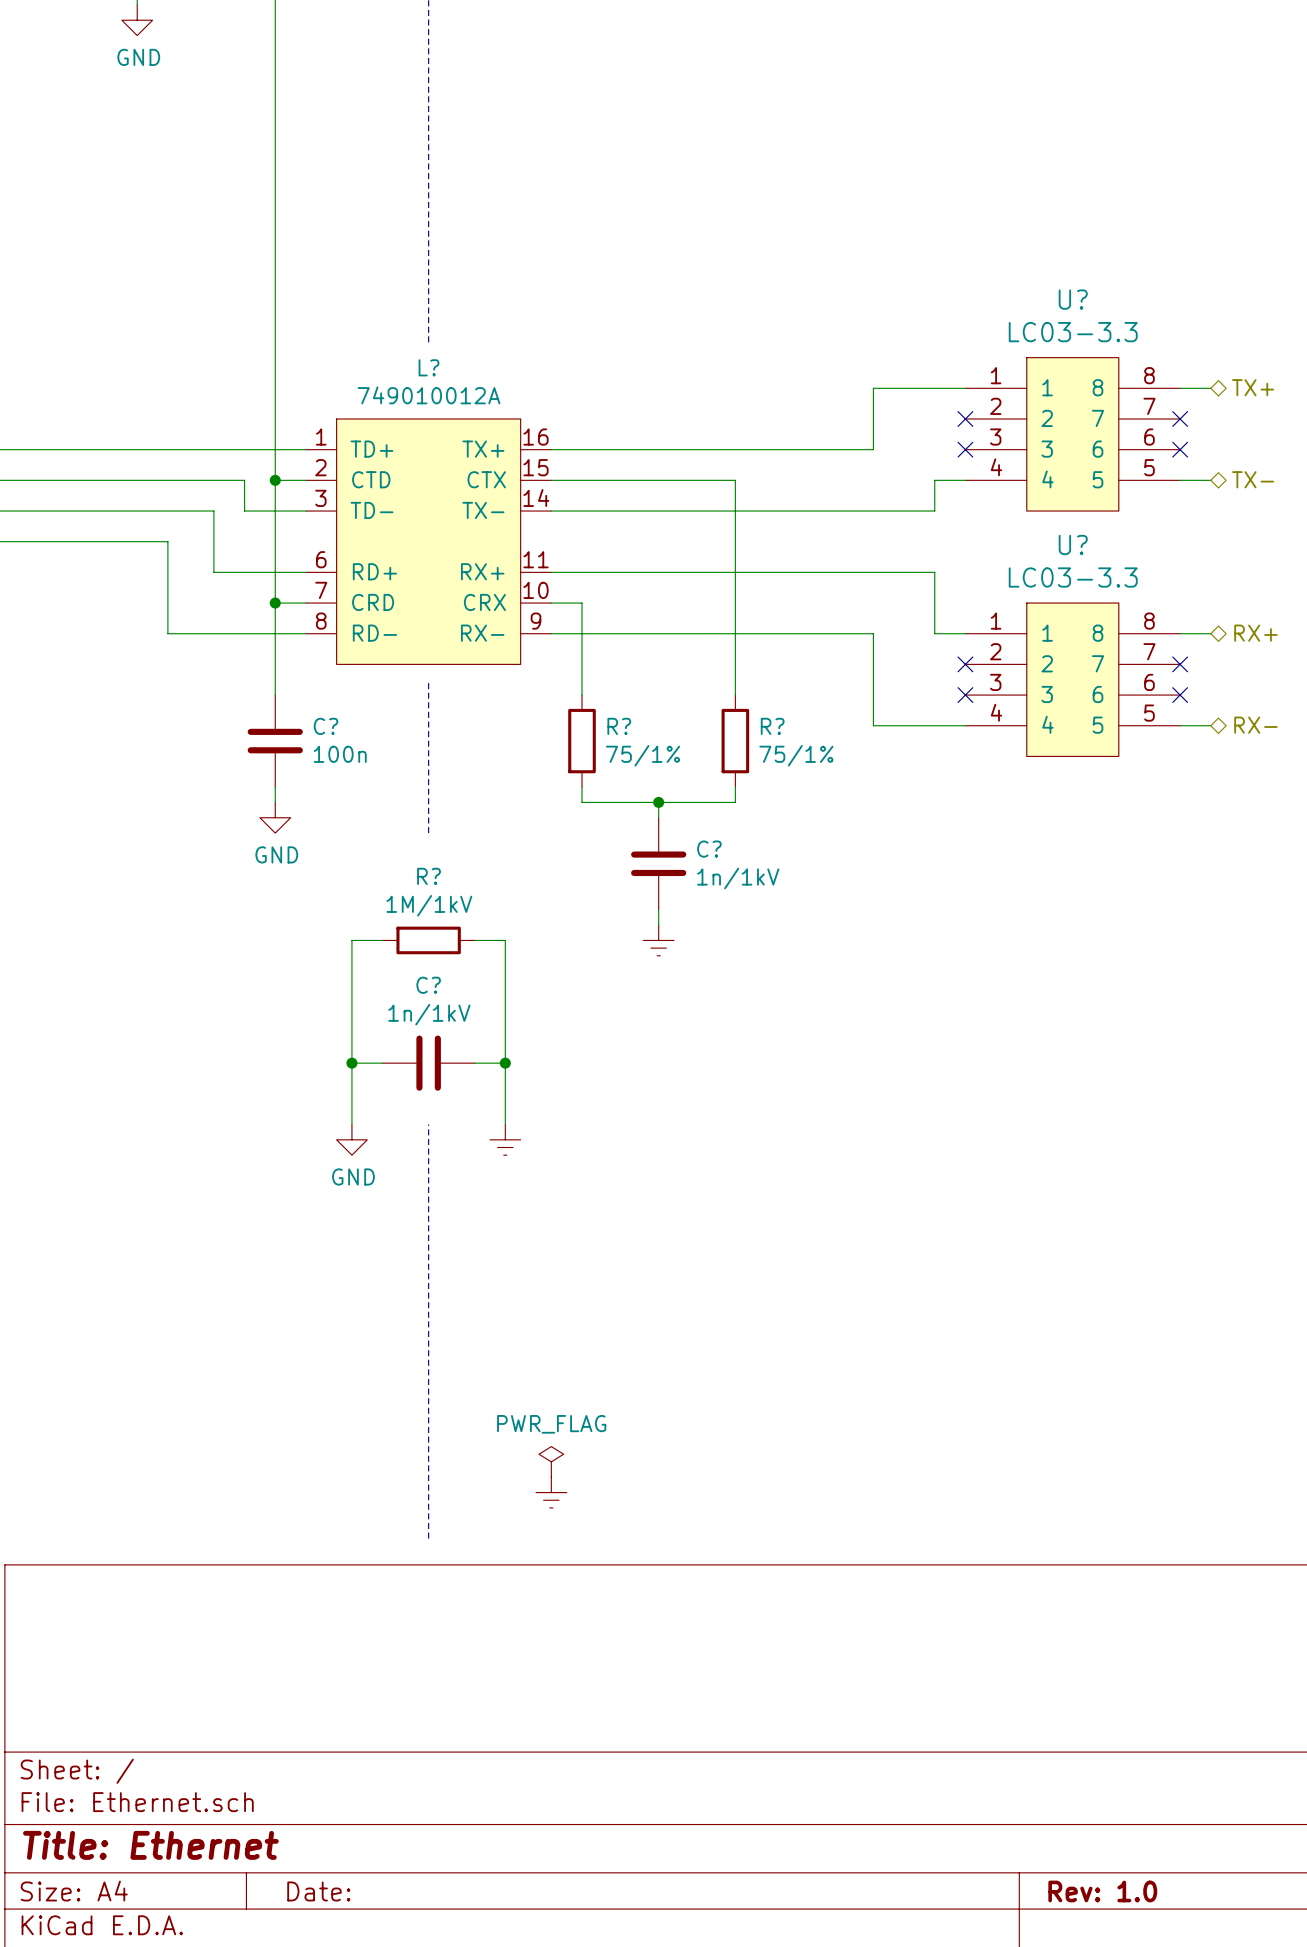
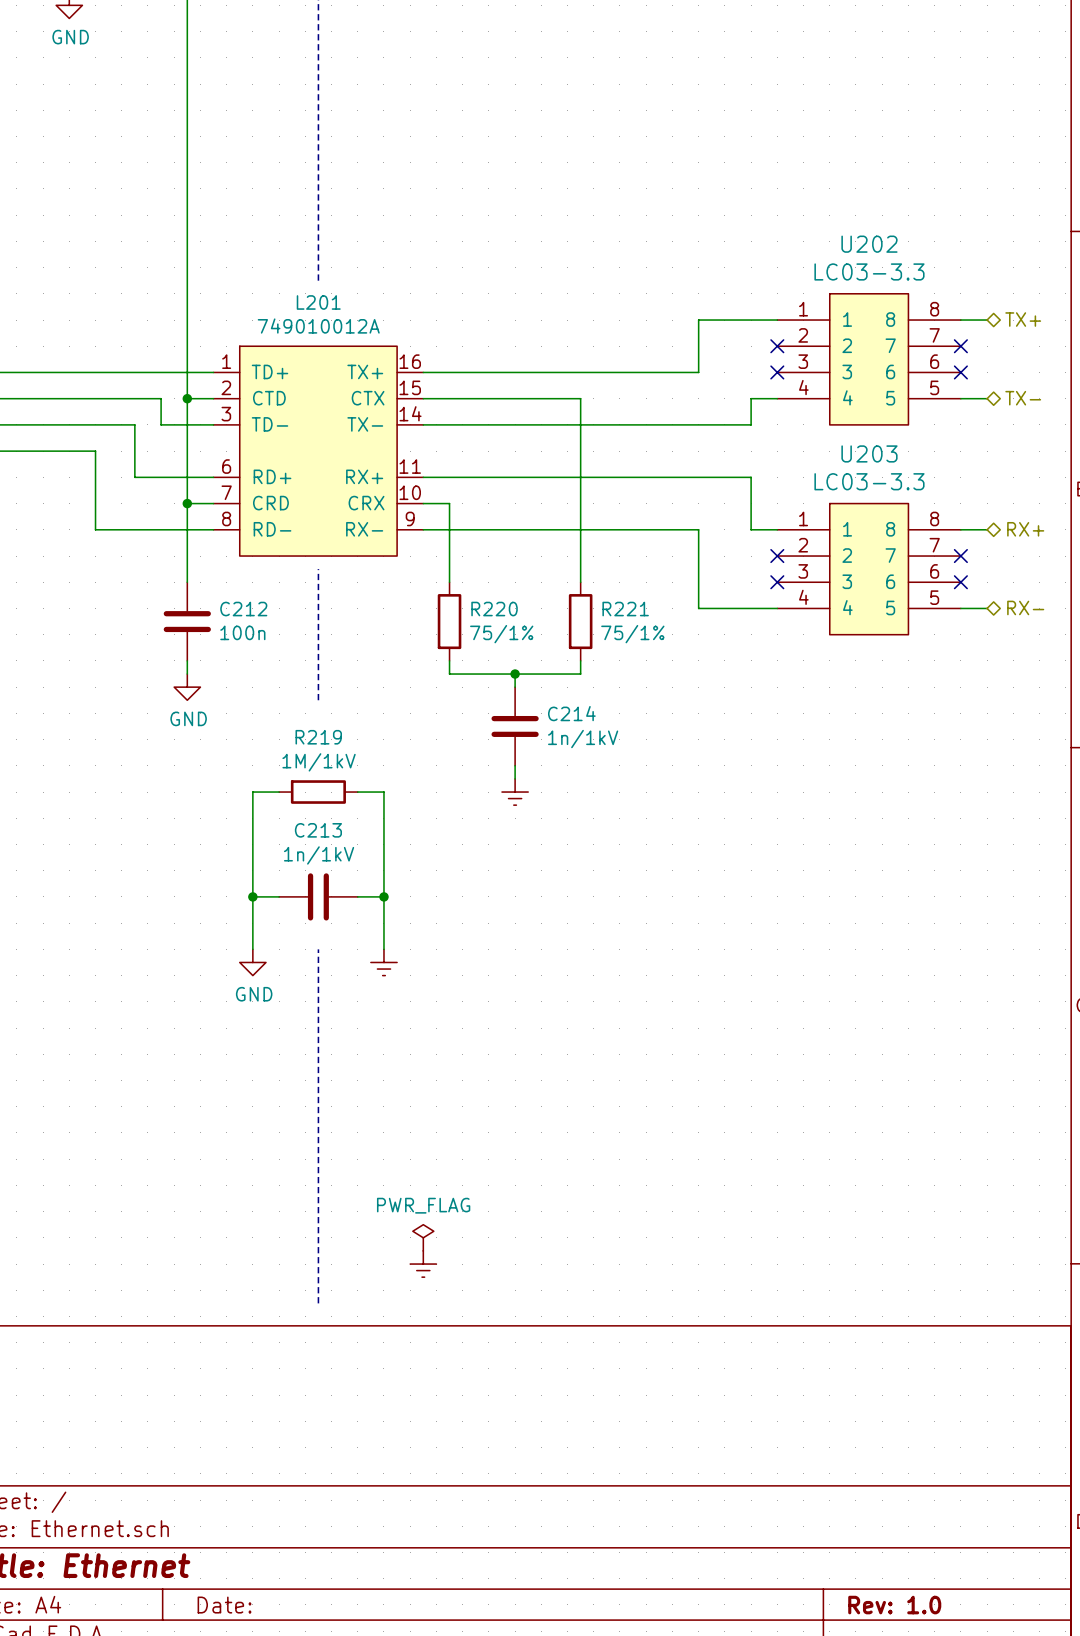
U? name: U? (1073, 299) -> U202 (869, 244)
L? name: L? (429, 367) -> L201 (318, 302)
U? name: U? (1073, 544) -> U203 (869, 453)
C? name: C? (325, 726) -> C212 (243, 609)
R? name: R? (619, 726) -> R220 (494, 609)
R? name: R? (772, 726) -> R221 (625, 609)
C? name: C? (709, 849) -> C214 (571, 713)
R? name: R? (429, 876) -> R219 (318, 737)
C? name: C? (428, 985) -> C213 (318, 830)

